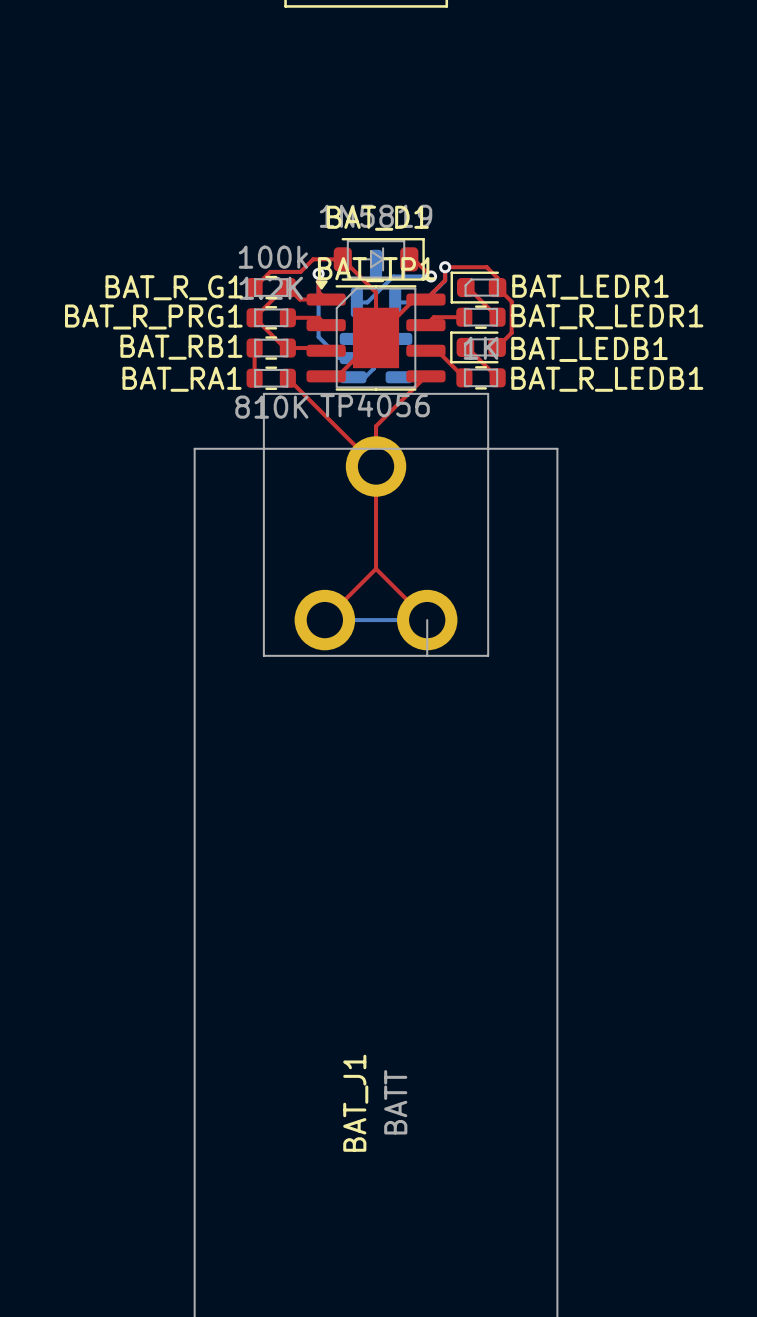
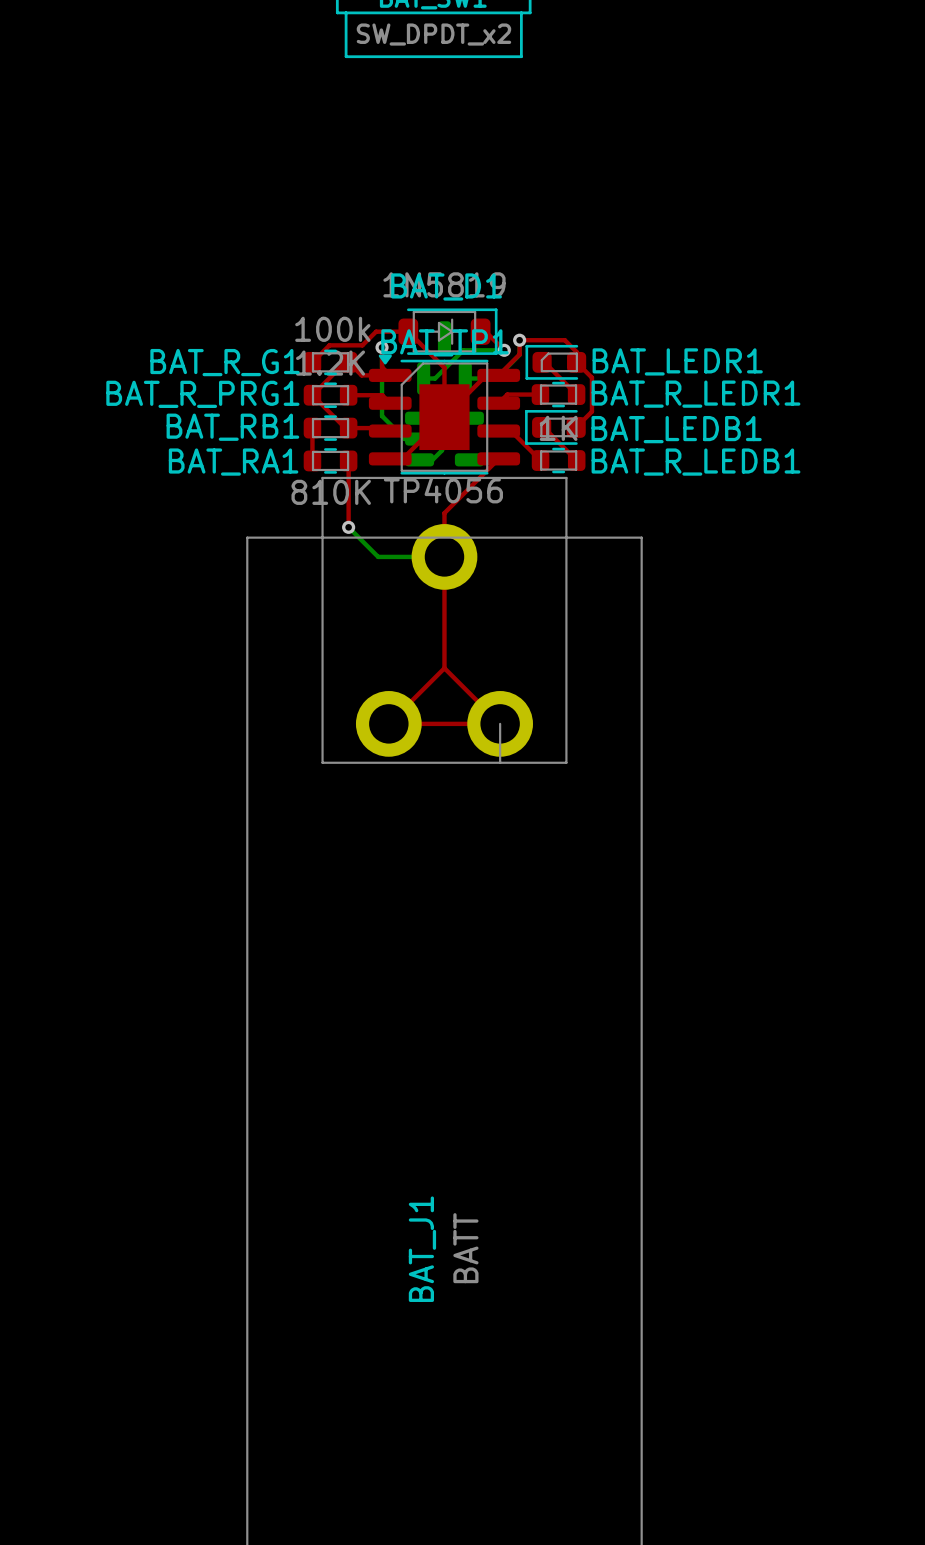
top track: (287, 378) (376, 466) -> (348, 461) (348, 527)
bottom track: none -> (348, 527) (378, 556) (444, 556)
via: none -> (348, 527)
top track: none -> (388, 723) (500, 723)
bottom track: (324, 620) (427, 620) -> none

